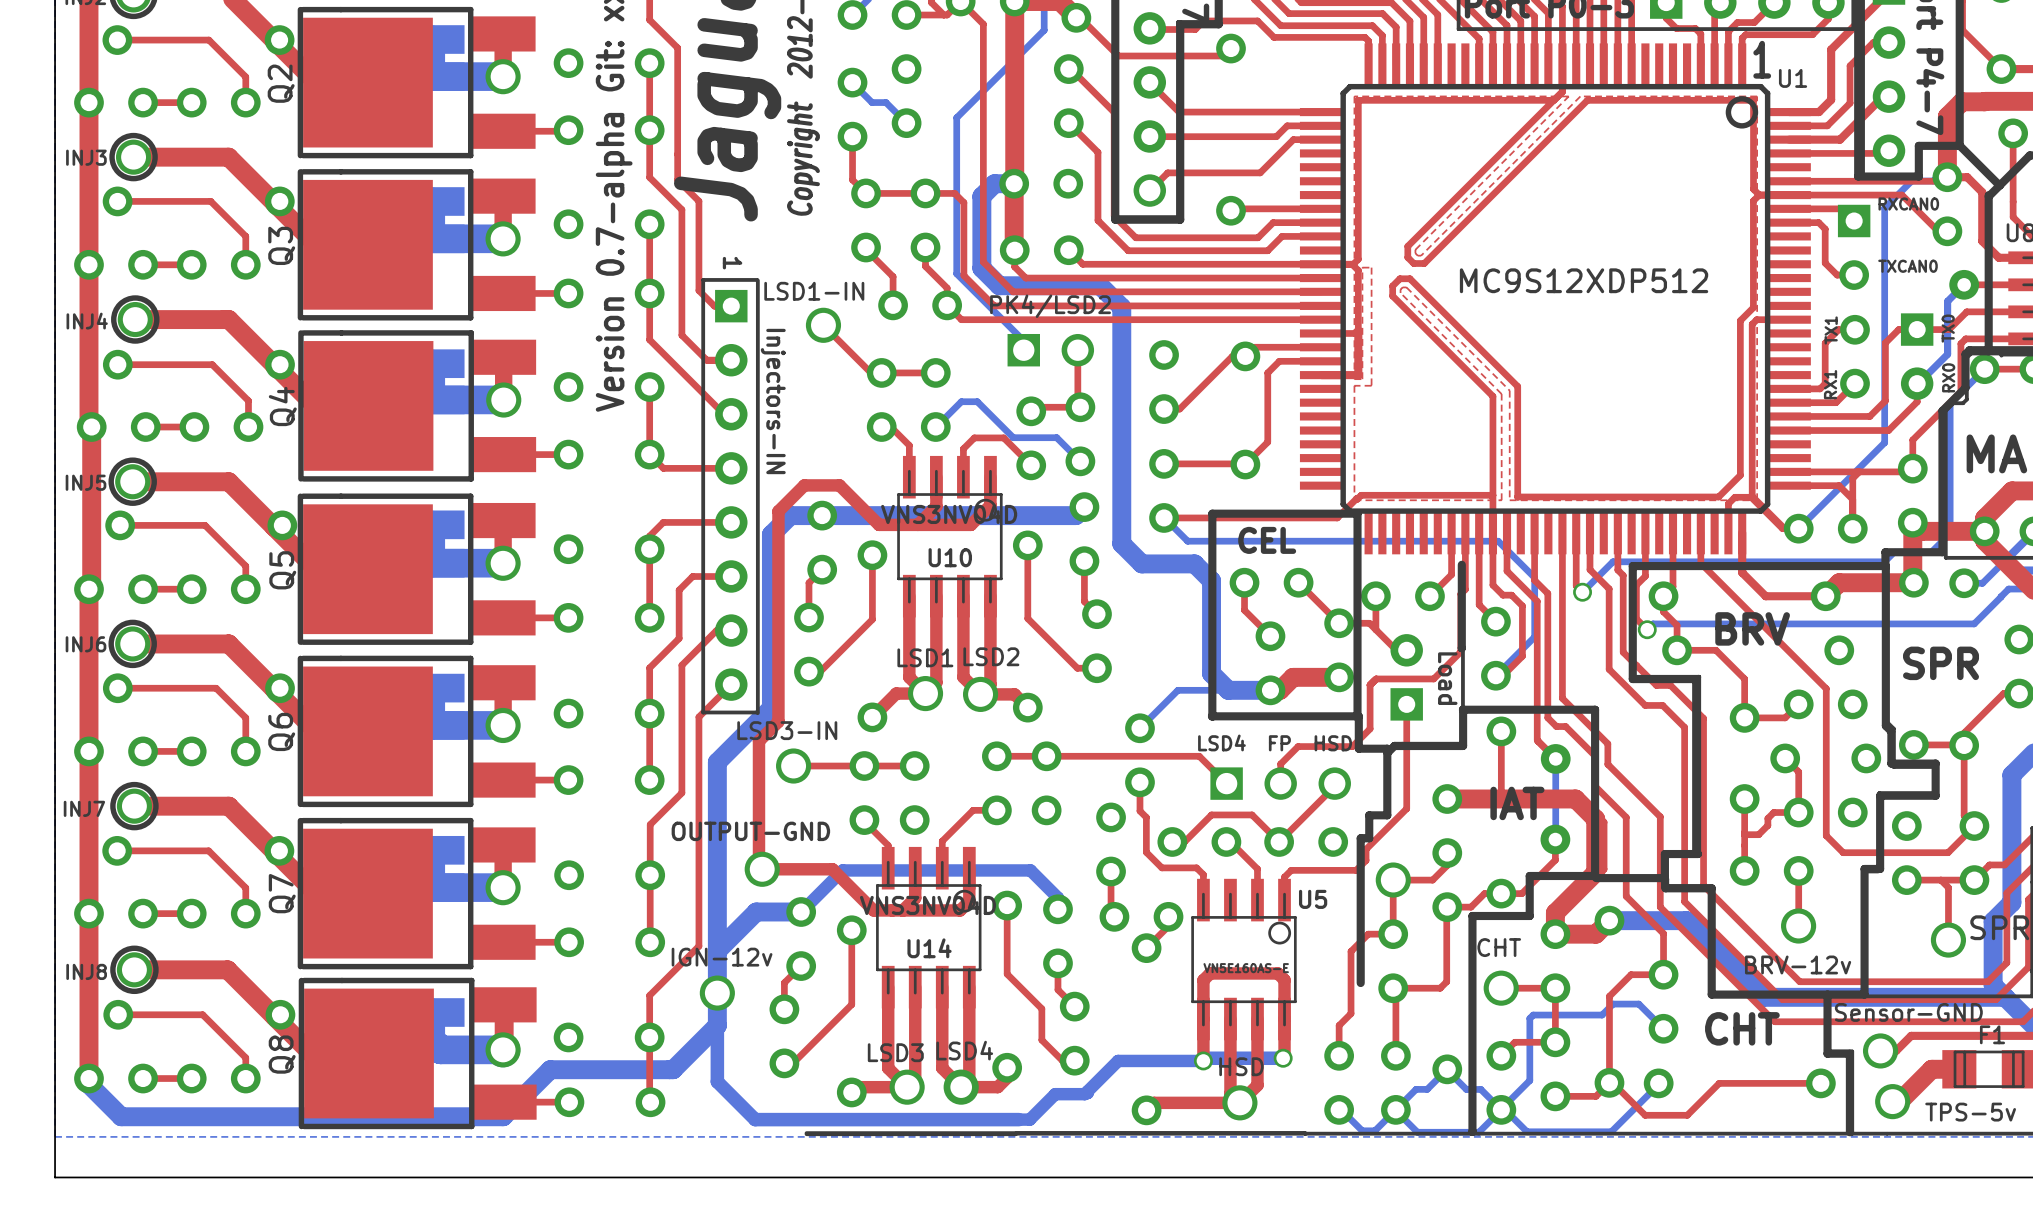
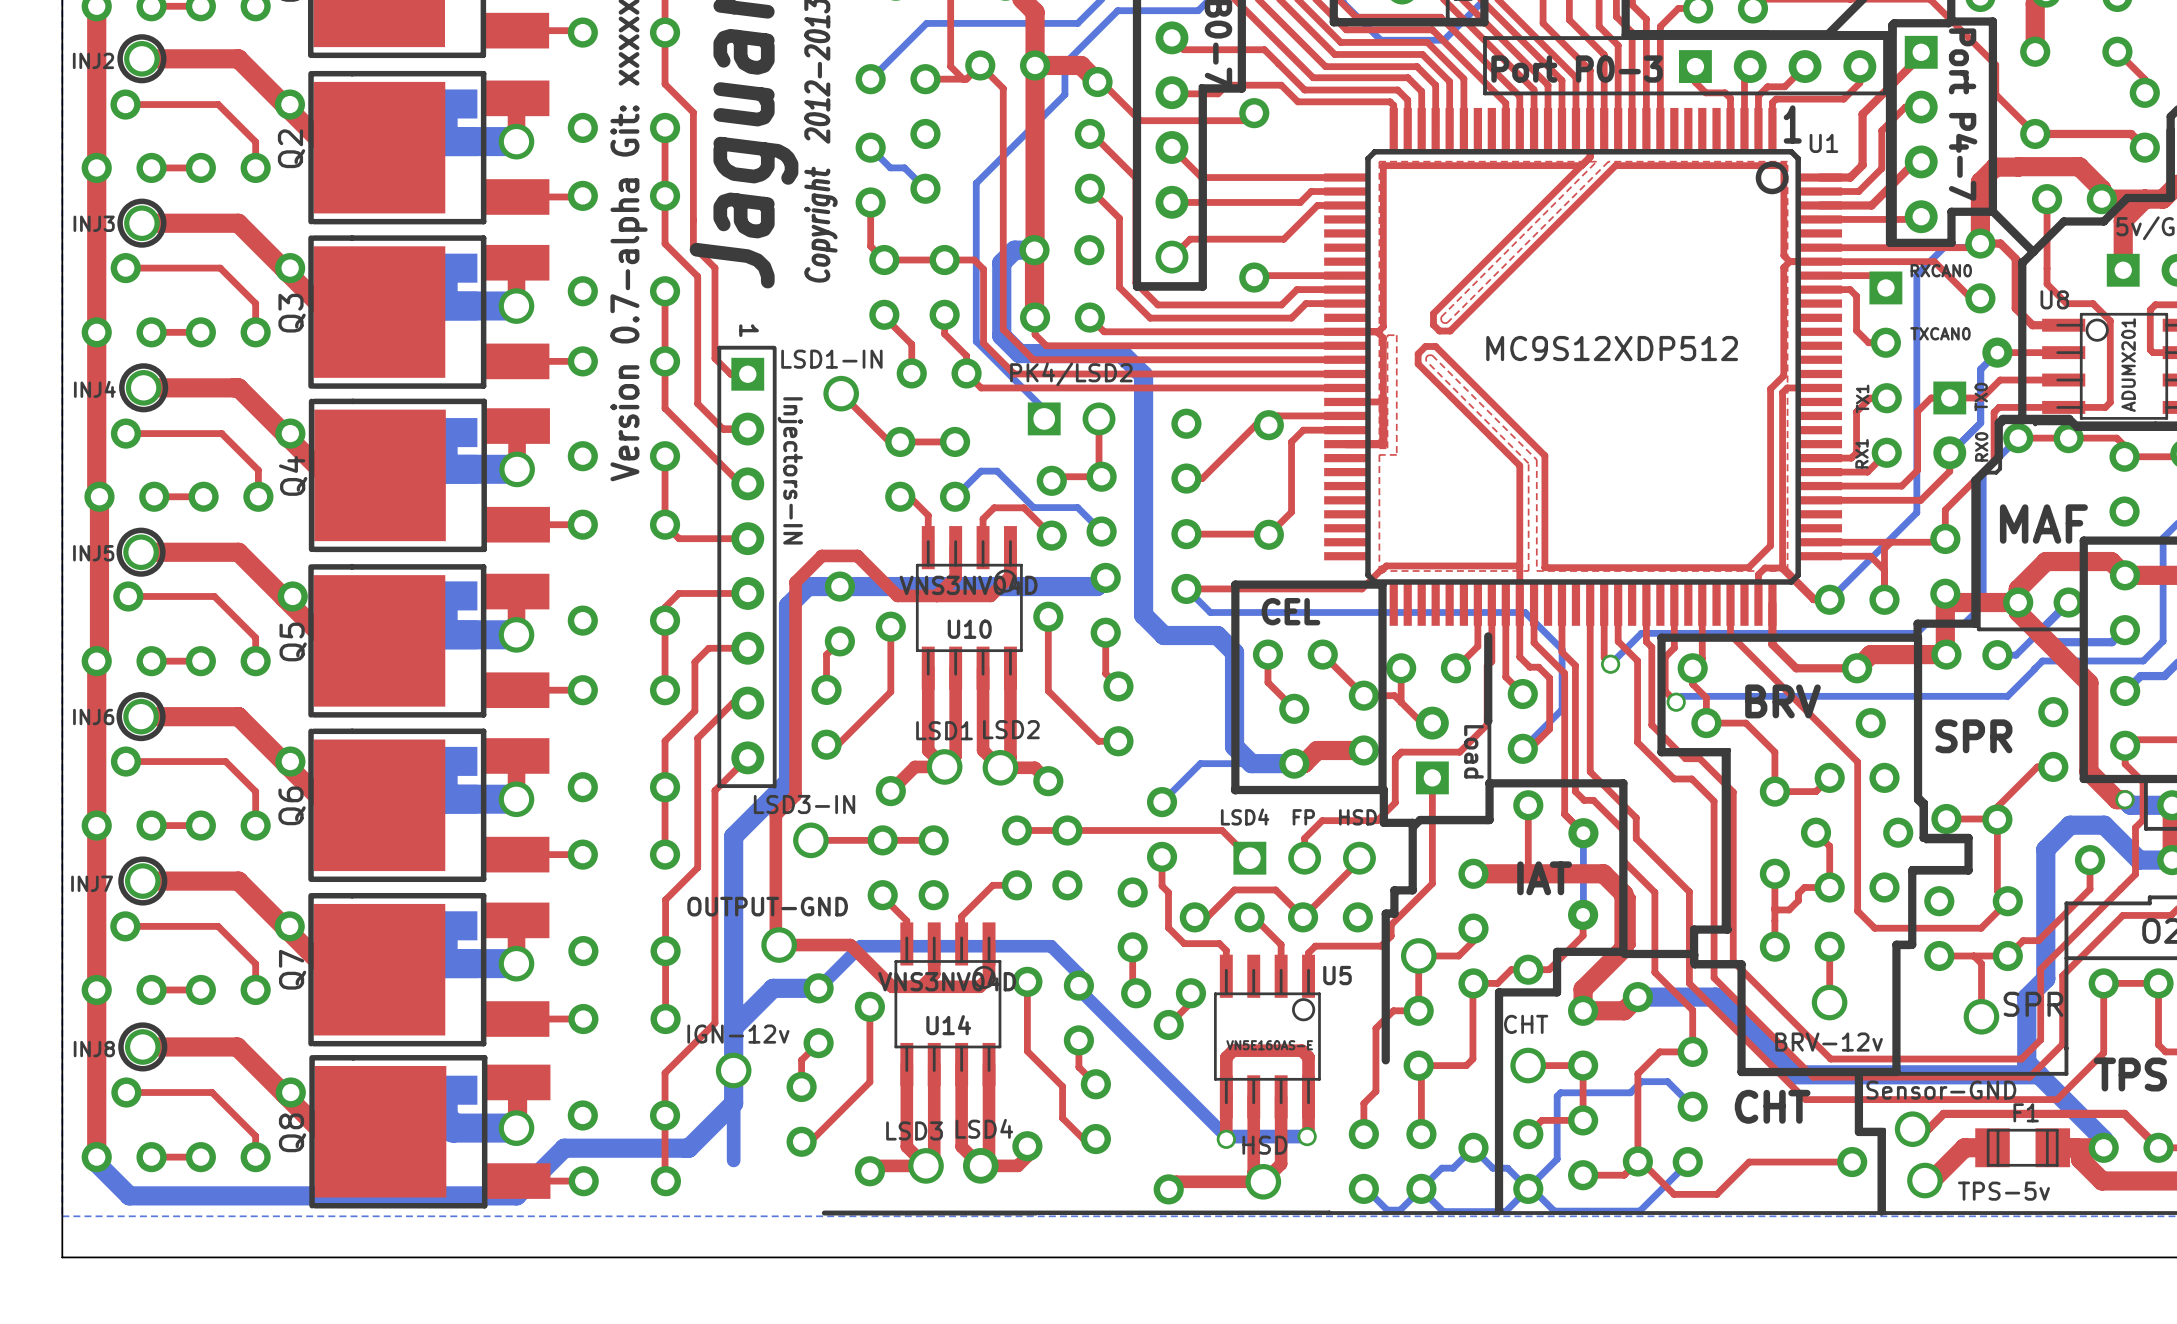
bottom track: (1203, 1060) (1118, 1060) (1087, 1093) (1055, 1094) (1029, 1119) (755, 1119) (717, 1081) -> (1226, 1139) (1226, 1136) (1078, 989) (1078, 985)

